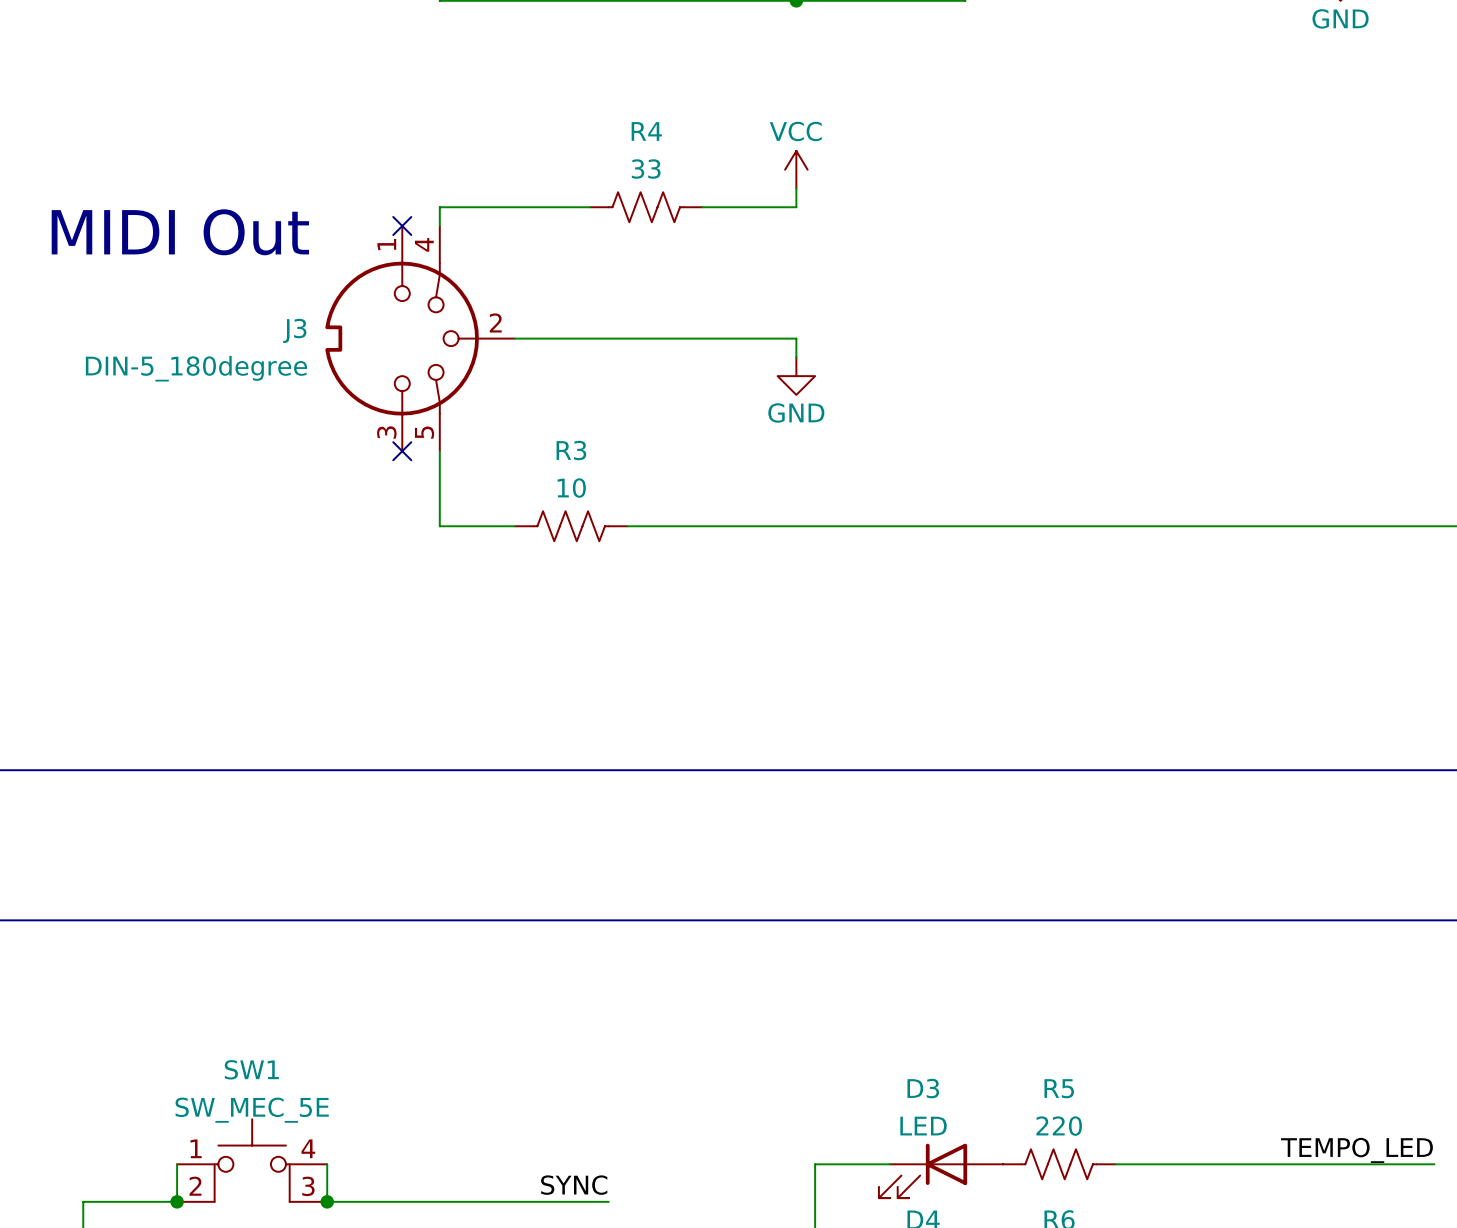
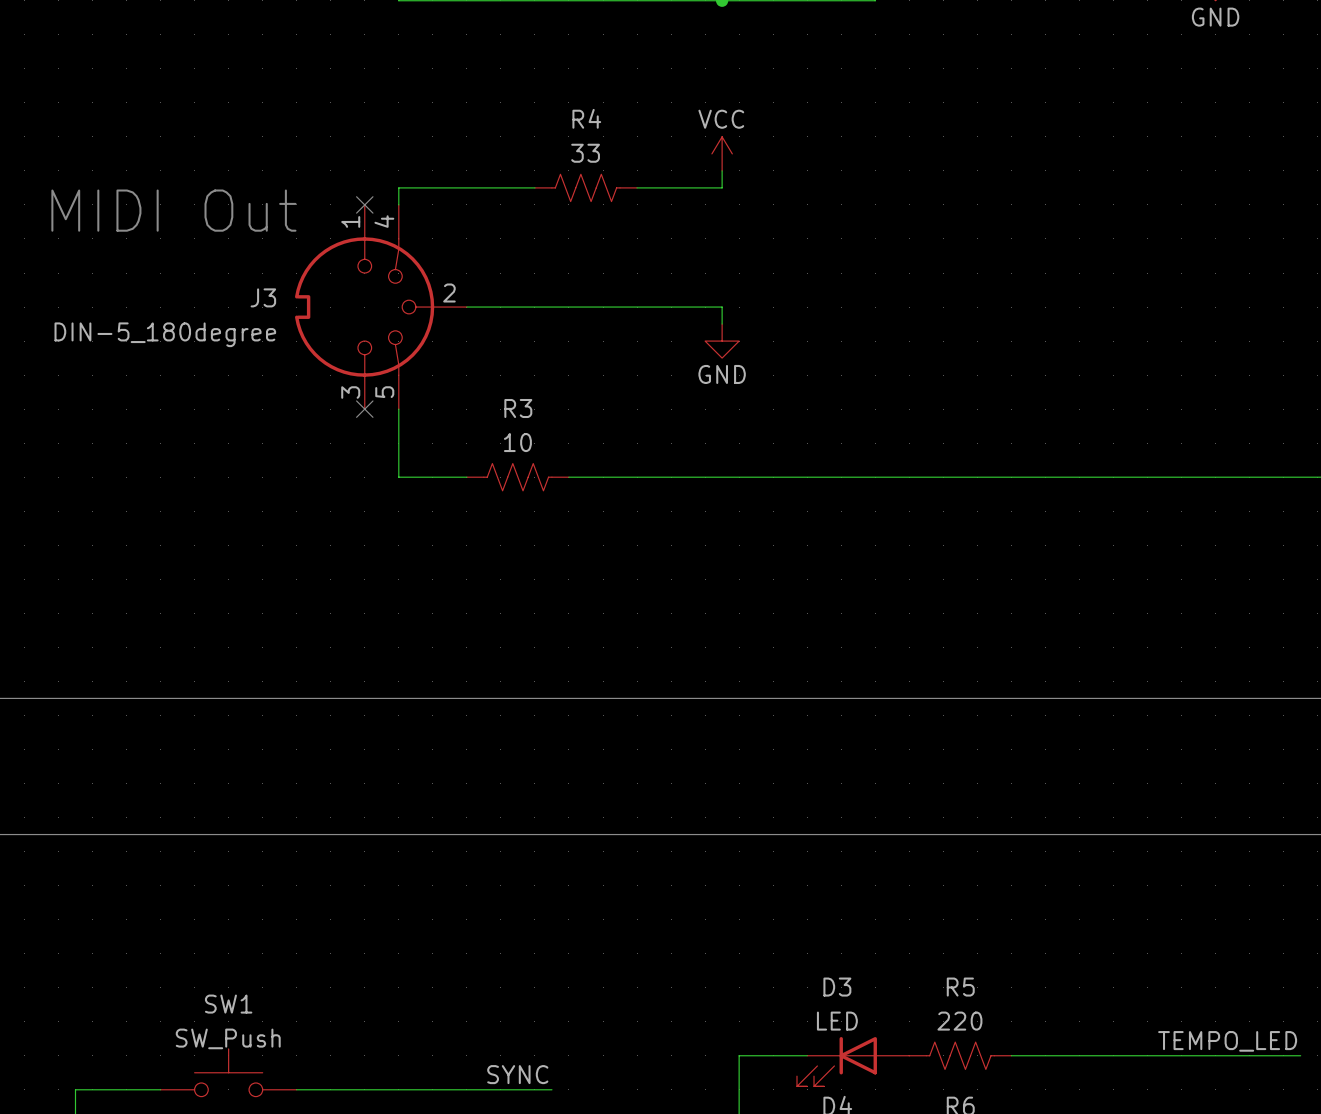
SW1 value: SW_MEC_5E (252, 1110) -> SW_Push (228, 1038)
SW1 symbol: [177, 1119, 328, 1202] -> [160, 1048, 297, 1097]
wire: (177, 1164) (177, 1201) -> none
wire: (327, 1164) (327, 1201) -> none
junction: (177, 1201) -> none
junction: (327, 1201) -> none

